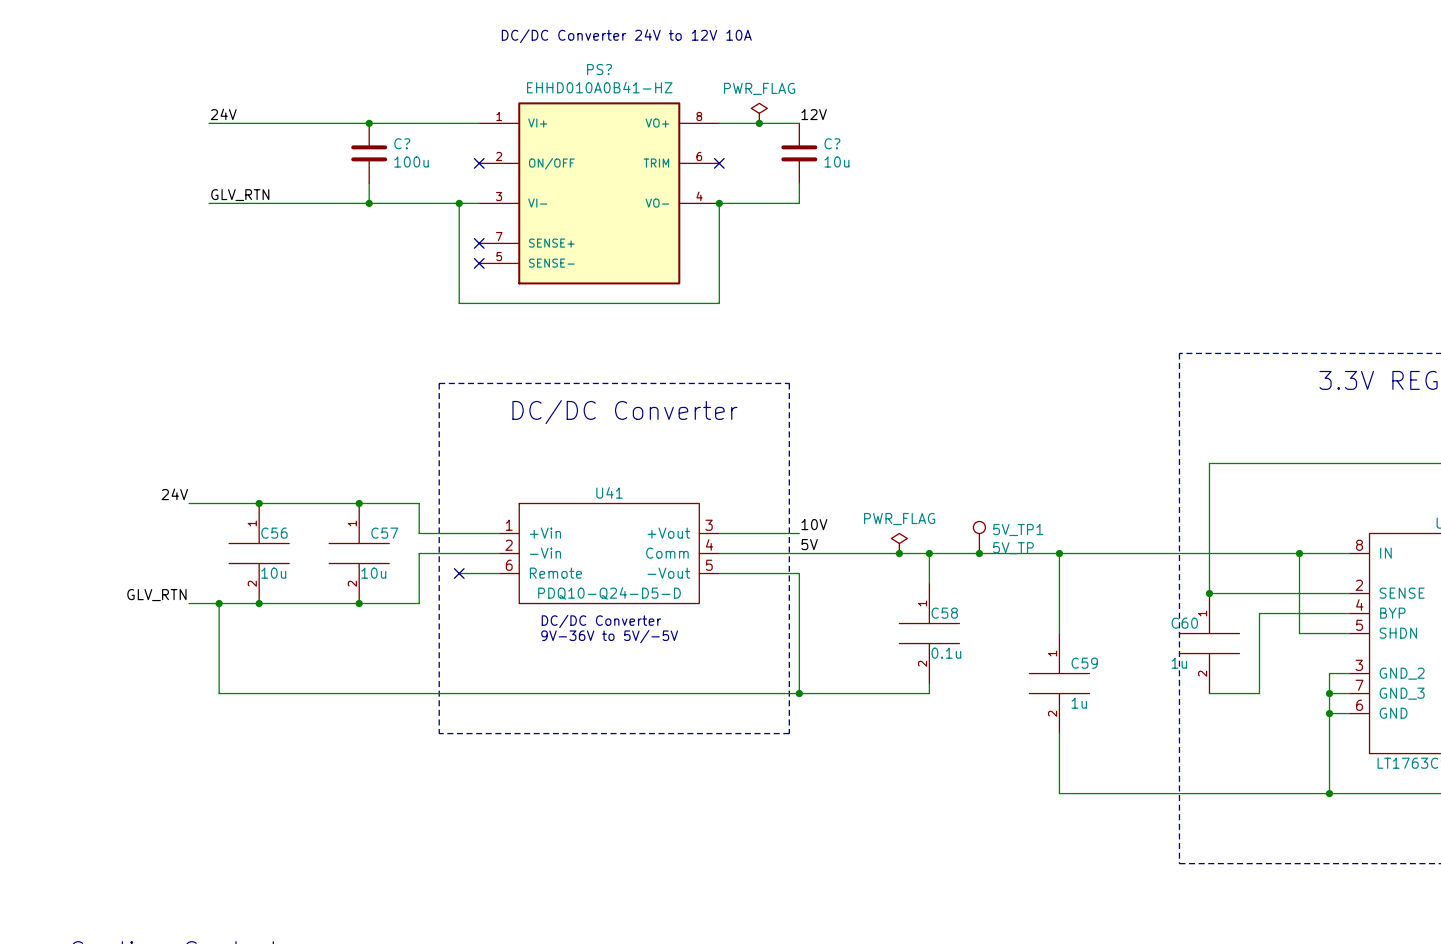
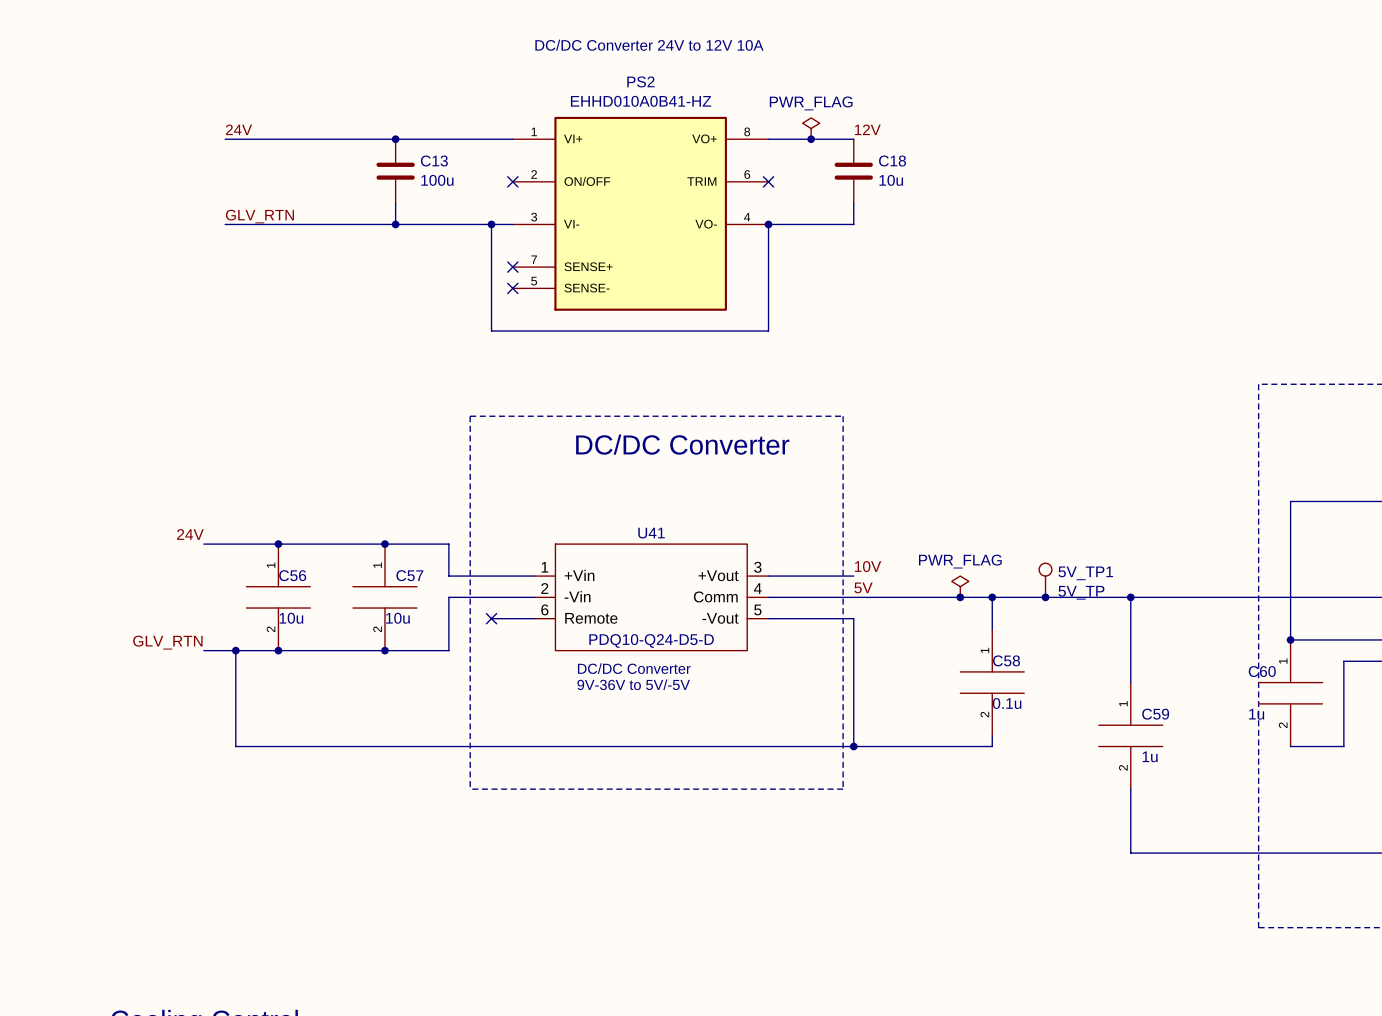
PS? name: PS? (599, 69) -> PS2 (640, 81)
C? name: C? (402, 143) -> C13 (434, 160)
C? name: C? (832, 143) -> C18 (892, 160)

